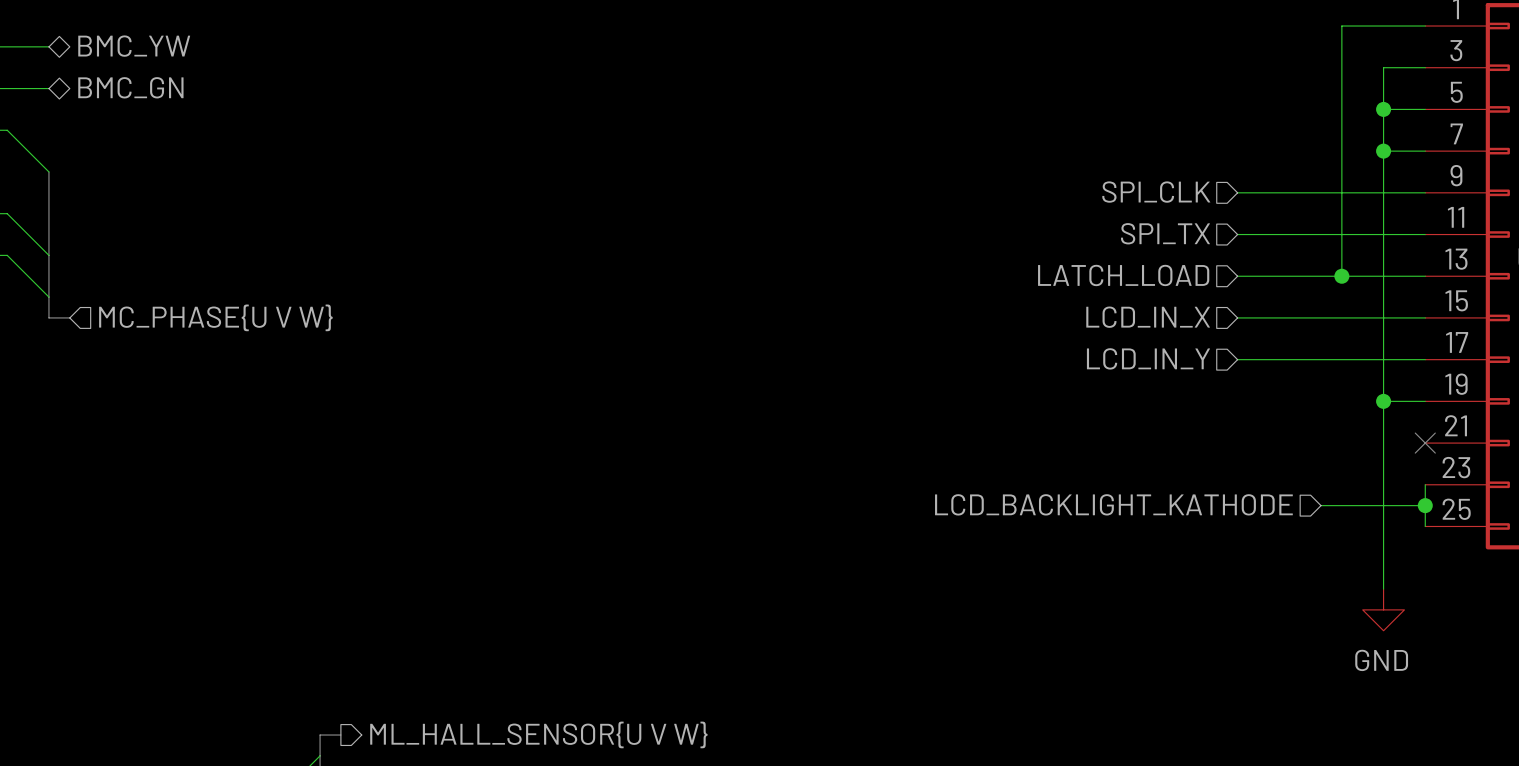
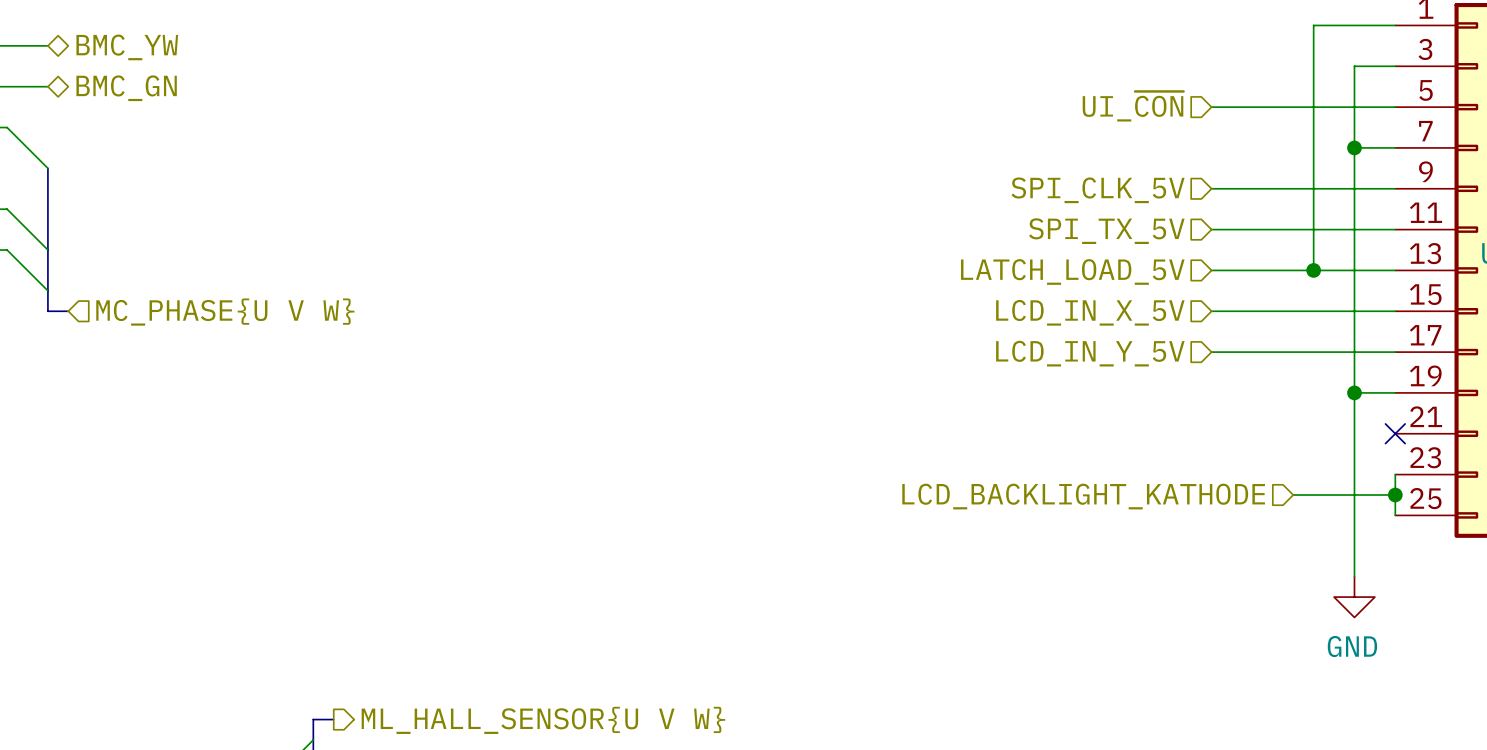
hierarchical label: none -> UI_~{CON} (1133, 106)
wire: none -> (1211, 107) (1354, 107)
junction: (1383, 109) -> none
hierarchical label: SPI_CLK (1156, 192) -> SPI_CLK_5V (1098, 190)
hierarchical label: SPI_TX (1165, 233) -> SPI_TX_5V (1106, 231)
hierarchical label: LATCH_LOAD (1123, 275) -> LATCH_LOAD_5V (1072, 271)
hierarchical label: LCD_IN_X (1148, 317) -> LCD_IN_X_5V (1090, 312)
hierarchical label: LCD_IN_Y (1148, 358) -> LCD_IN_Y_5V (1090, 353)

